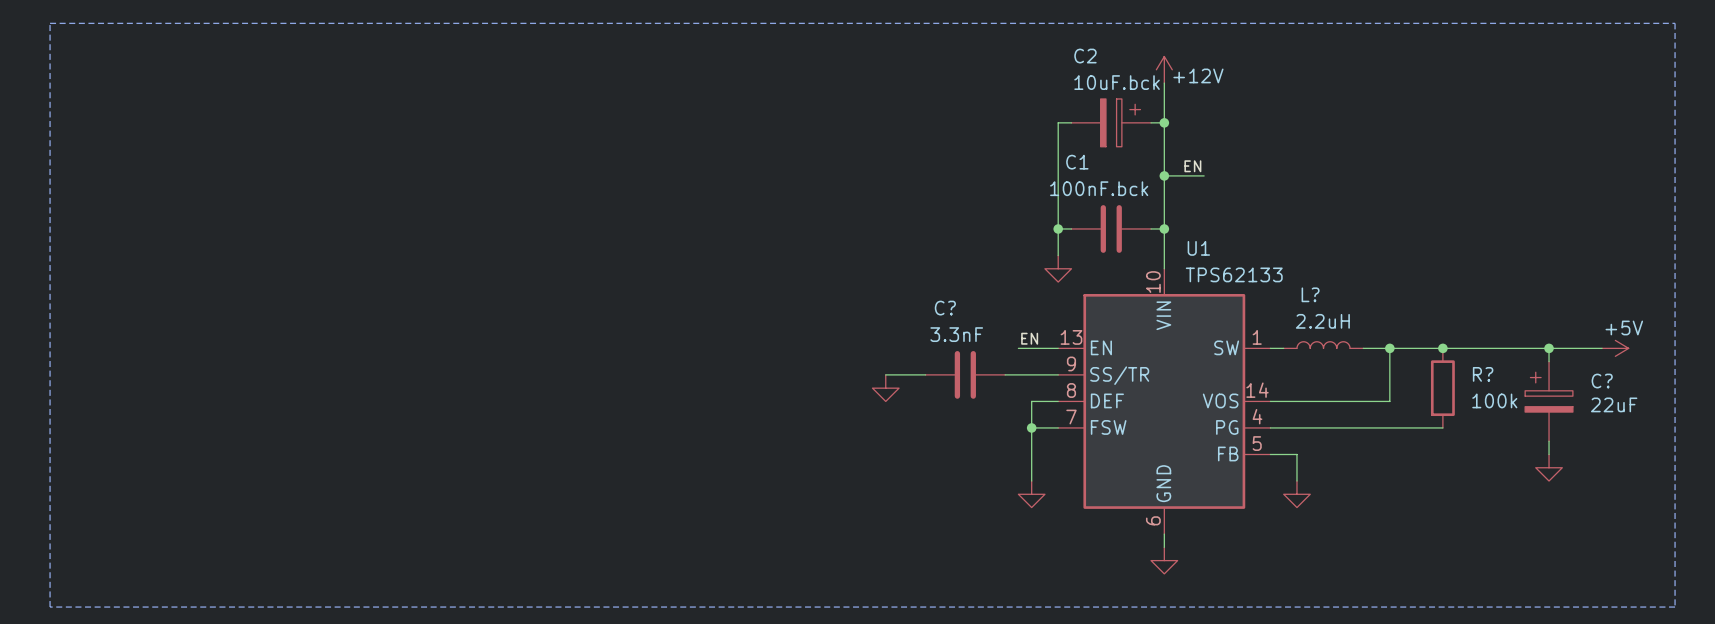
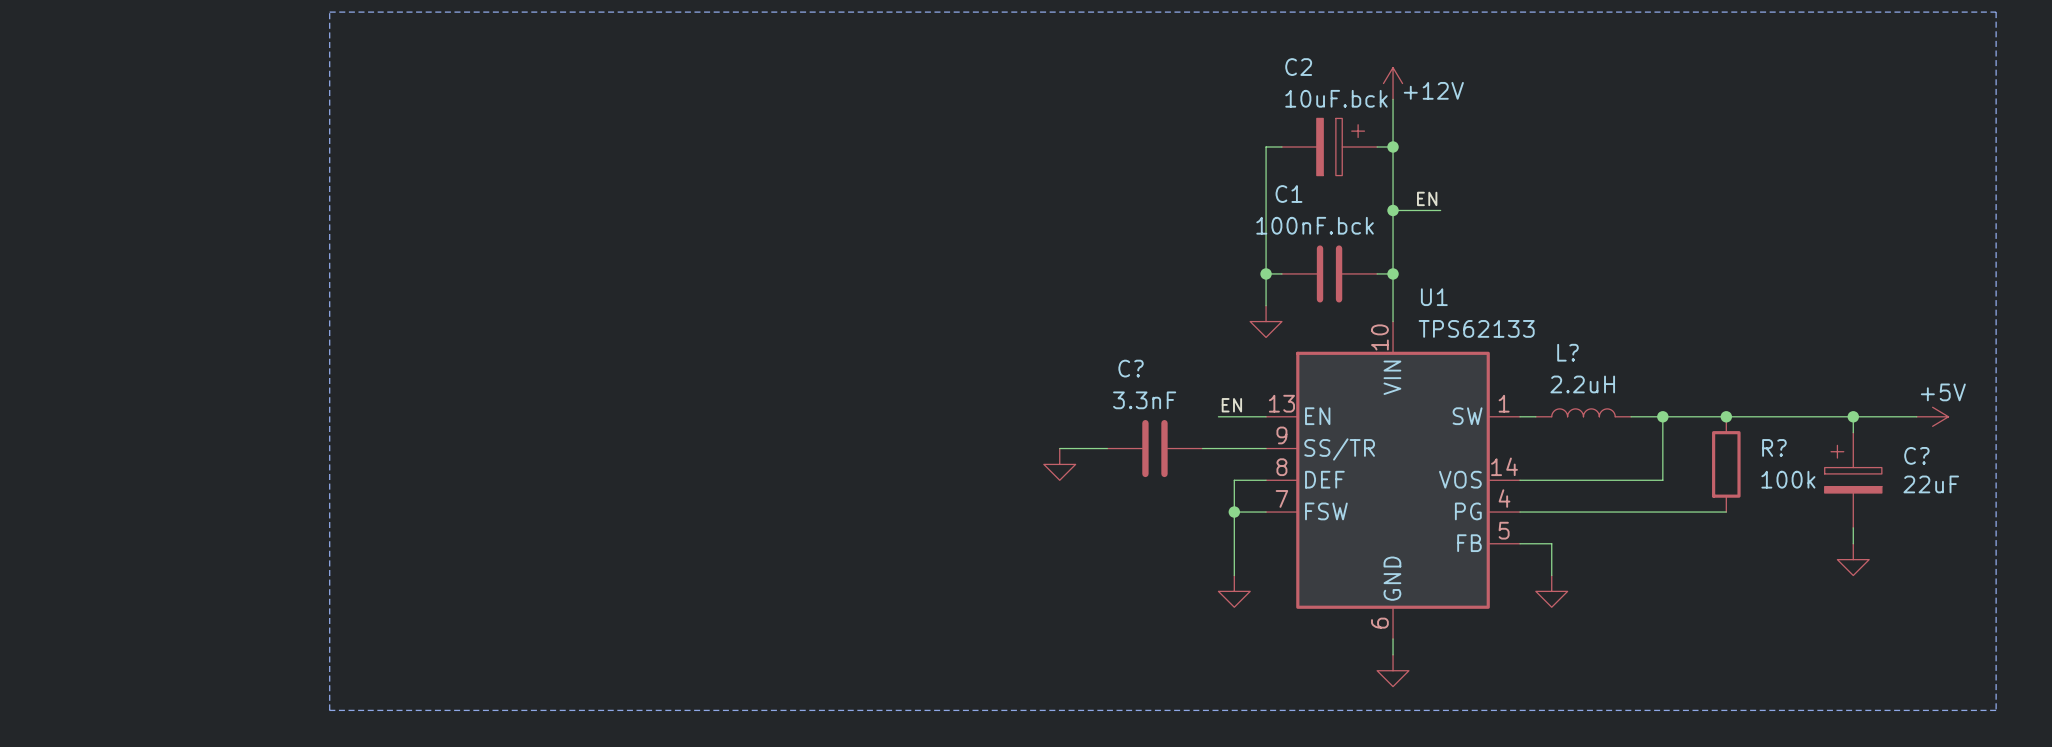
line: (50, 23) (1675, 23) (1675, 607) (50, 607) (50, 23) -> (329, 12) (329, 710) (1996, 710) (1996, 12) (329, 12)

